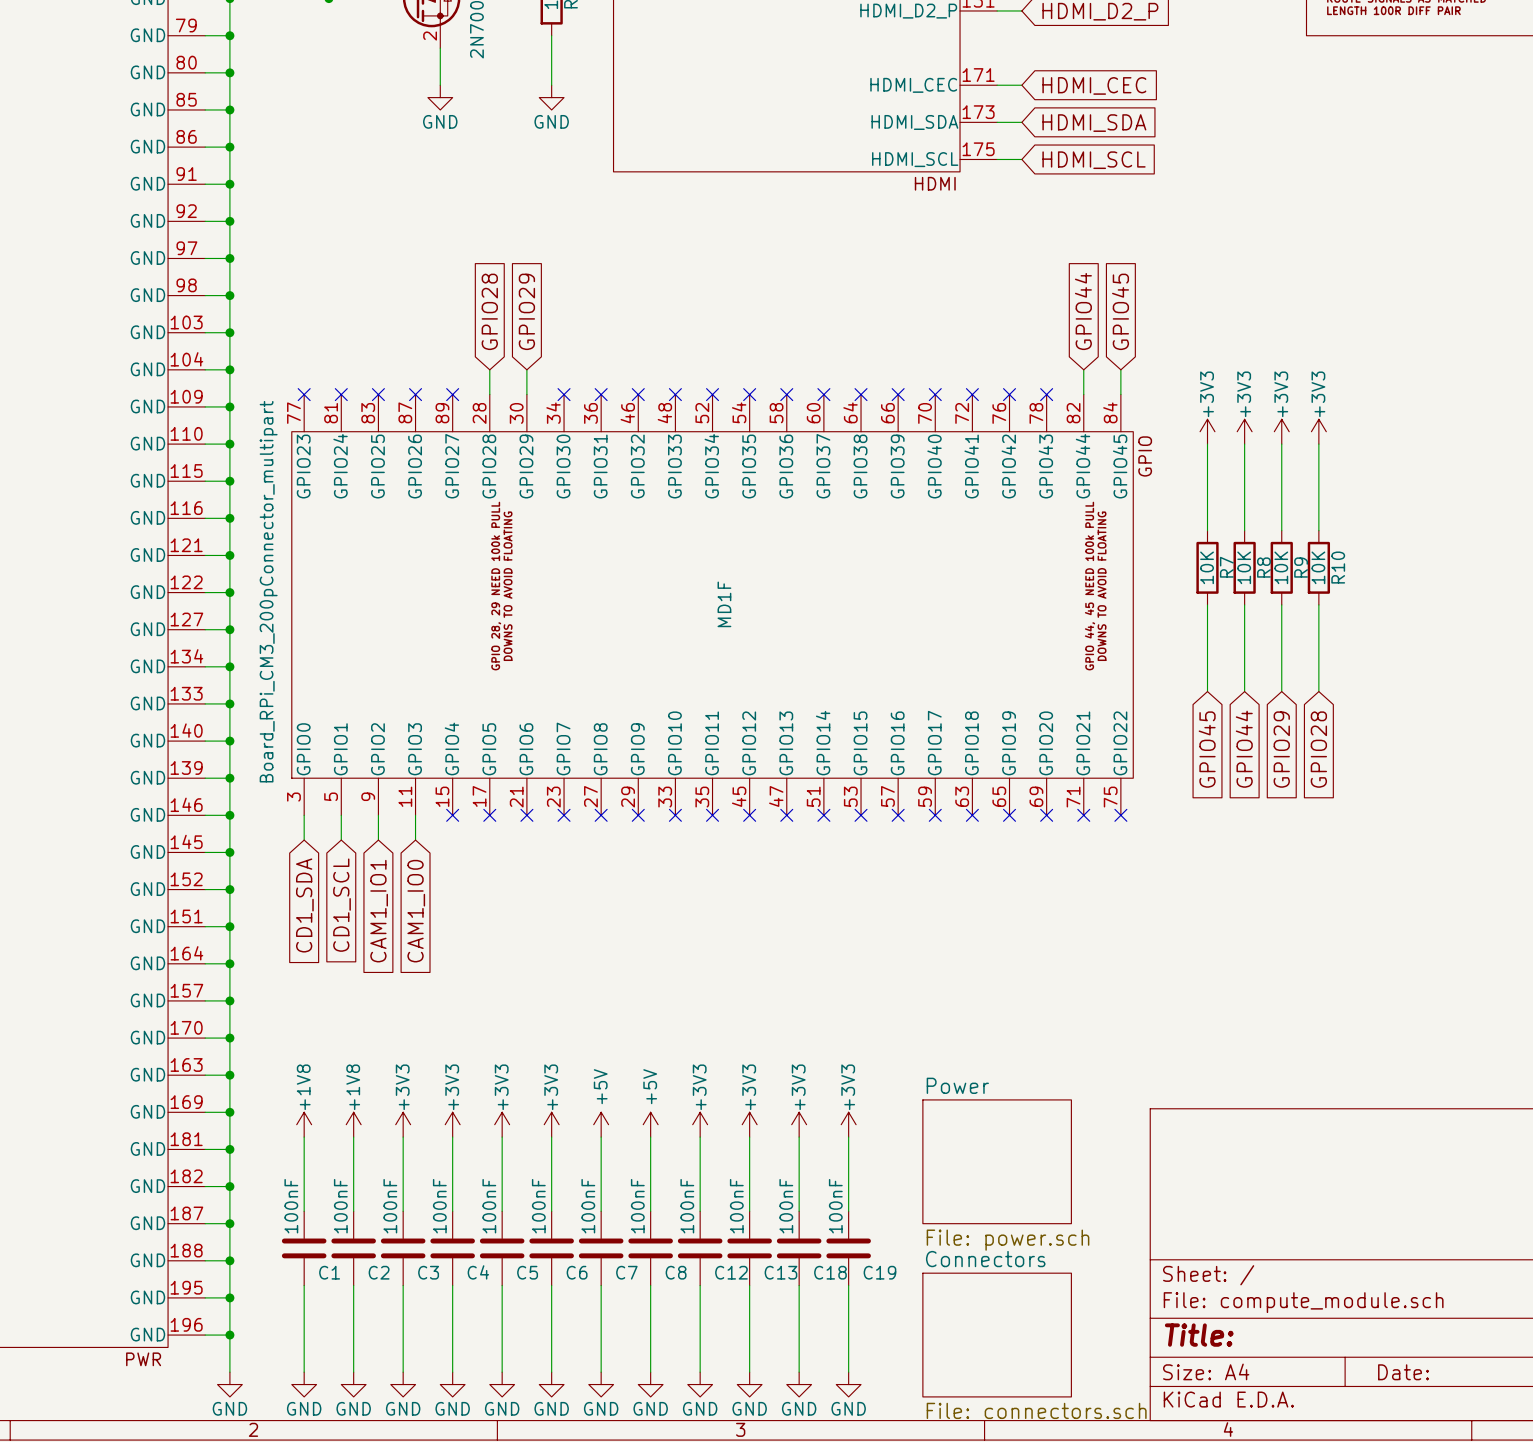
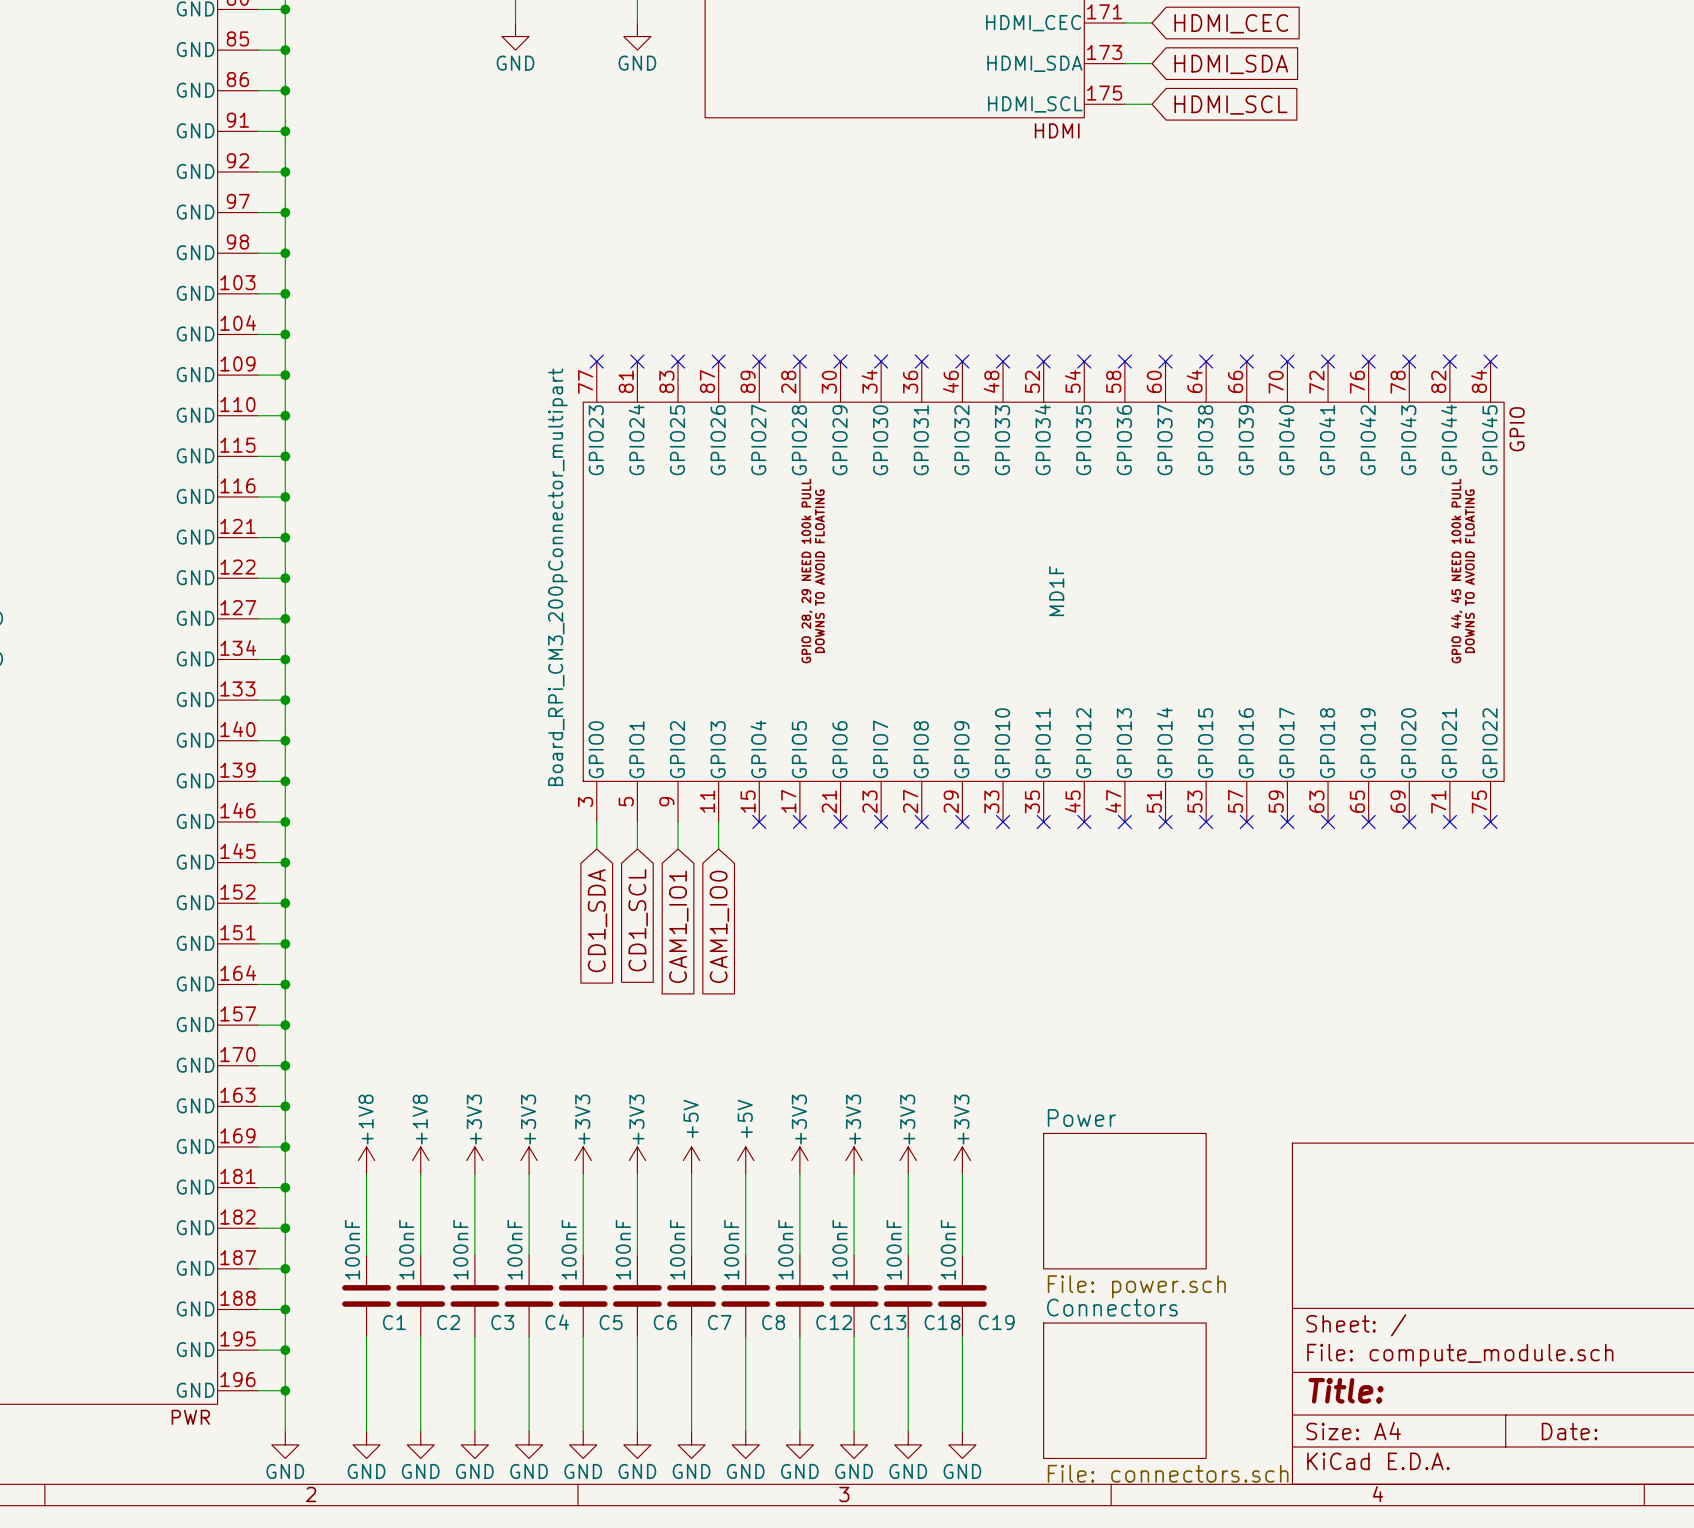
global label: GPIO28 (489, 311) -> none
global label: GPIO29 (526, 311) -> none
global label: GPIO44 (1083, 311) -> none
global label: GPIO45 (1120, 311) -> none
wire: (489, 369) (489, 394) -> none
wire: (526, 369) (526, 394) -> none
wire: (1083, 369) (1083, 394) -> none
wire: (1120, 369) (1120, 394) -> none
no-connect mark: (304, 394) -> none
no-connect mark: (341, 394) -> none
no-connect mark: (378, 394) -> none
no-connect mark: (415, 394) -> none
no-connect mark: (452, 394) -> none
no-connect mark: none -> (596, 361)
no-connect mark: none -> (637, 361)
no-connect mark: (564, 394) -> none
no-connect mark: none -> (678, 361)
no-connect mark: (601, 394) -> none
no-connect mark: none -> (718, 361)
no-connect mark: (638, 394) -> none
no-connect mark: none -> (759, 361)
no-connect mark: (675, 394) -> none
no-connect mark: none -> (799, 361)
no-connect mark: (712, 394) -> none
no-connect mark: none -> (840, 361)
no-connect mark: (749, 394) -> none
no-connect mark: none -> (881, 361)
no-connect mark: (786, 394) -> none
no-connect mark: none -> (921, 361)
no-connect mark: (823, 394) -> none
no-connect mark: none -> (962, 361)
no-connect mark: (861, 394) -> none
no-connect mark: none -> (1003, 361)
no-connect mark: (898, 394) -> none
no-connect mark: none -> (1043, 361)
no-connect mark: (935, 394) -> none
no-connect mark: none -> (1084, 361)
no-connect mark: (972, 394) -> none
no-connect mark: none -> (1124, 361)
no-connect mark: (1009, 394) -> none
no-connect mark: none -> (1165, 361)
no-connect mark: (1046, 394) -> none
no-connect mark: none -> (1206, 361)
no-connect mark: none -> (1246, 361)
no-connect mark: none -> (1287, 361)
no-connect mark: none -> (1328, 361)
no-connect mark: none -> (1368, 361)
no-connect mark: none -> (1409, 361)
no-connect mark: none -> (1449, 361)
no-connect mark: none -> (1490, 361)
power symbol: +3V3 (1207, 431) -> none
power symbol: +3V3 (1244, 431) -> none
power symbol: +3V3 (1281, 431) -> none
power symbol: +3V3 (1318, 431) -> none
wire: (1207, 444) (1207, 530) -> none
wire: (1244, 444) (1244, 530) -> none
wire: (1281, 444) (1281, 530) -> none
wire: (1318, 444) (1318, 530) -> none
R7: 10K (1207, 567) -> none
R8: 10K (1244, 567) -> none
R9: 10K (1281, 567) -> none
R10: 10K (1318, 567) -> none
MD1F position: (712, 604) -> (1043, 591)
wire: (1207, 604) (1207, 691) -> none
wire: (1244, 604) (1244, 691) -> none
wire: (1281, 604) (1281, 691) -> none
wire: (1318, 604) (1318, 691) -> none
global label: GPIO45 (1207, 749) -> none
global label: GPIO44 (1244, 749) -> none
global label: GPIO29 (1281, 749) -> none
global label: GPIO28 (1318, 749) -> none
wire: (304, 815) (304, 840) -> (596, 821) (596, 849)
wire: (341, 815) (341, 840) -> (637, 821) (637, 849)
wire: (378, 815) (378, 840) -> (678, 821) (678, 849)
wire: (415, 815) (415, 840) -> (718, 821) (718, 849)
no-connect mark: (452, 815) -> none
no-connect mark: (489, 815) -> none
no-connect mark: (526, 815) -> none
no-connect mark: (564, 815) -> none
no-connect mark: (601, 815) -> none
no-connect mark: (638, 815) -> none
no-connect mark: none -> (759, 821)
no-connect mark: (675, 815) -> none
no-connect mark: none -> (799, 821)
no-connect mark: (712, 815) -> none
no-connect mark: none -> (840, 821)
no-connect mark: (749, 815) -> none
no-connect mark: none -> (881, 821)
no-connect mark: (786, 815) -> none
no-connect mark: none -> (921, 821)
no-connect mark: (823, 815) -> none
no-connect mark: none -> (962, 821)
no-connect mark: (861, 815) -> none
no-connect mark: none -> (1003, 821)
no-connect mark: (898, 815) -> none
no-connect mark: none -> (1043, 821)
no-connect mark: (935, 815) -> none
no-connect mark: none -> (1084, 821)
no-connect mark: (972, 815) -> none
no-connect mark: none -> (1124, 821)
no-connect mark: (1009, 815) -> none
no-connect mark: none -> (1165, 821)
no-connect mark: (1046, 815) -> none
no-connect mark: none -> (1206, 821)
no-connect mark: (1083, 815) -> none
no-connect mark: none -> (1246, 821)
no-connect mark: (1120, 815) -> none
no-connect mark: none -> (1287, 821)
no-connect mark: none -> (1328, 821)
no-connect mark: none -> (1368, 821)
no-connect mark: none -> (1409, 821)
no-connect mark: none -> (1449, 821)
no-connect mark: none -> (1490, 821)
global label position: CD1_SDA (304, 905) -> CD1_SDA (597, 920)
global label position: CD1_SCL (342, 905) -> CD1_SCL (638, 920)
global label position: CAM1_IO1 (379, 911) -> CAM1_IO1 (678, 926)
global label position: CAM1_IO0 (416, 911) -> CAM1_IO0 (719, 926)

